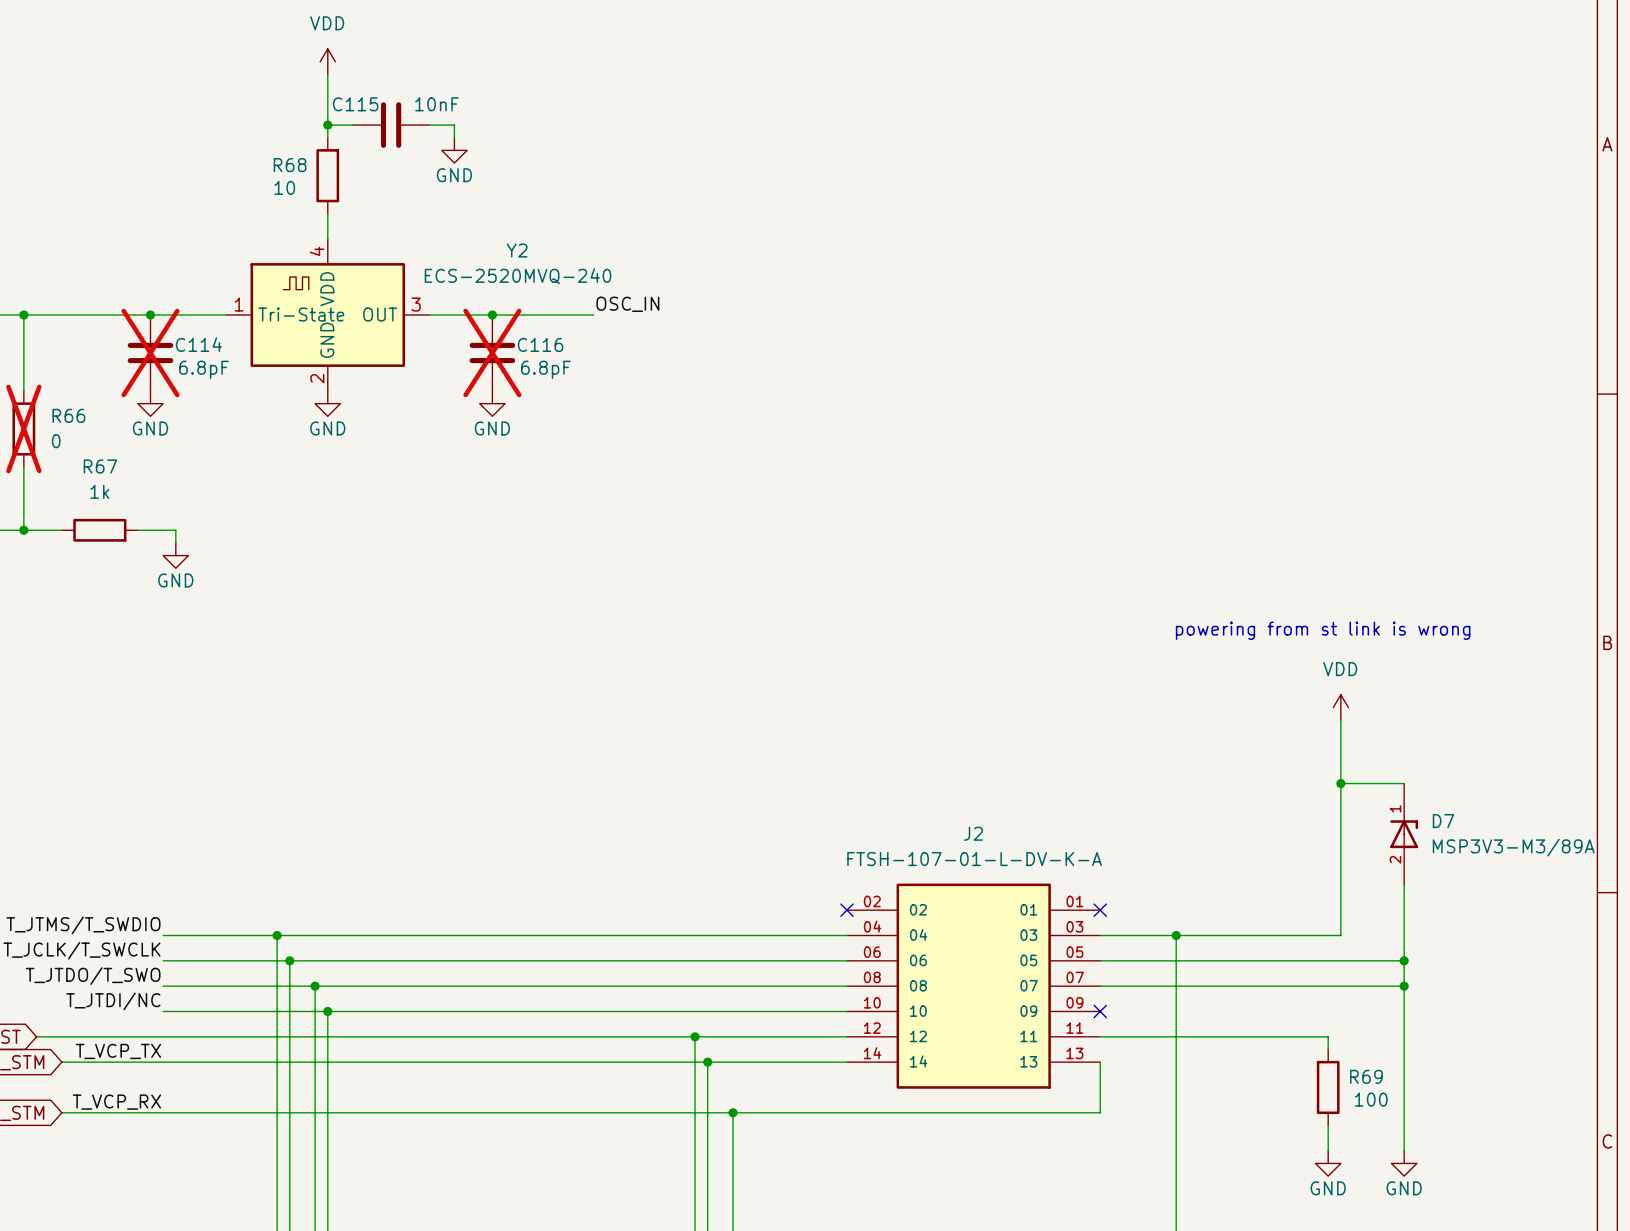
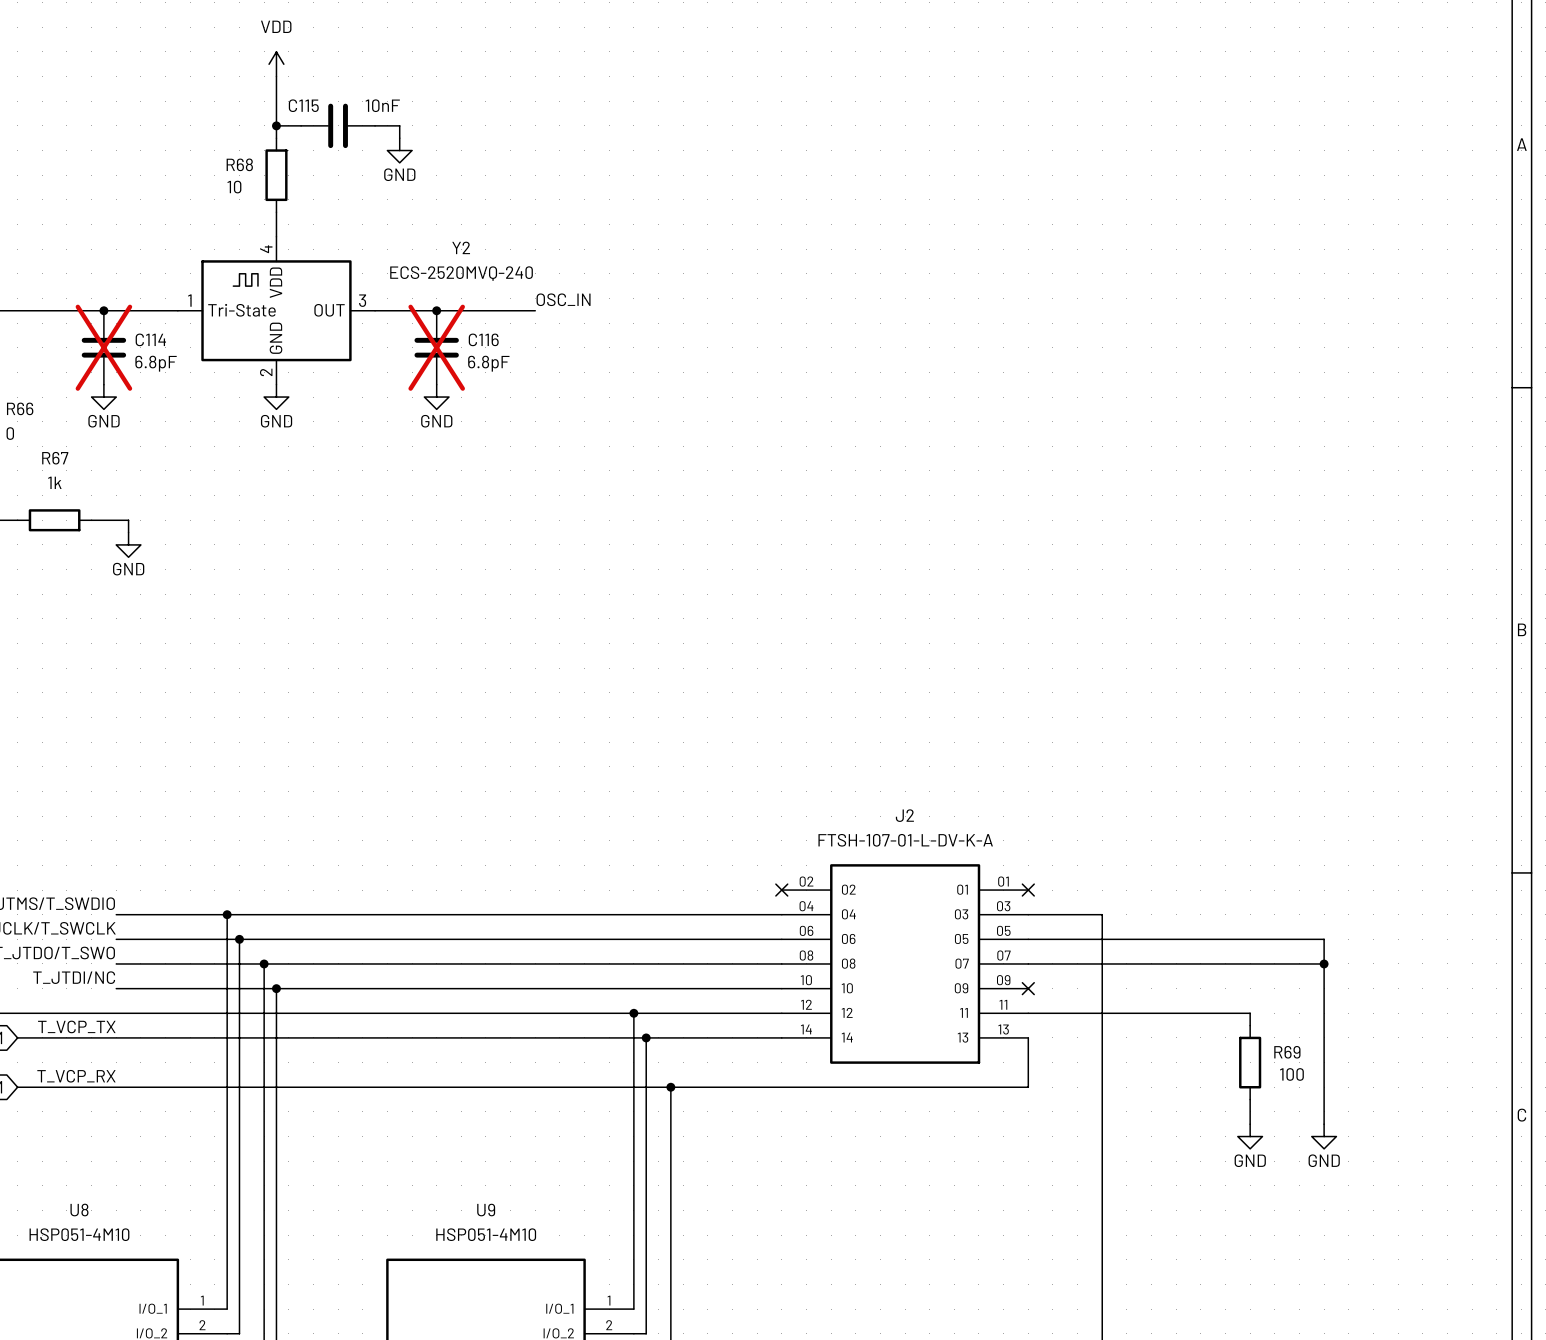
text: powering from st link is wrong (1323, 630) -> none
power symbol: VDD (1340, 707) -> none
wire: (1340, 720) (1340, 935) (1176, 935) -> none
wire: (1340, 783) (1404, 783) -> none
junction: (1340, 783) -> none
D7: MSP3V3-M3/89A (1404, 834) -> none
wire: (1404, 884) (1404, 960) -> none
junction: (1176, 935) -> none
junction: (1404, 960) -> none

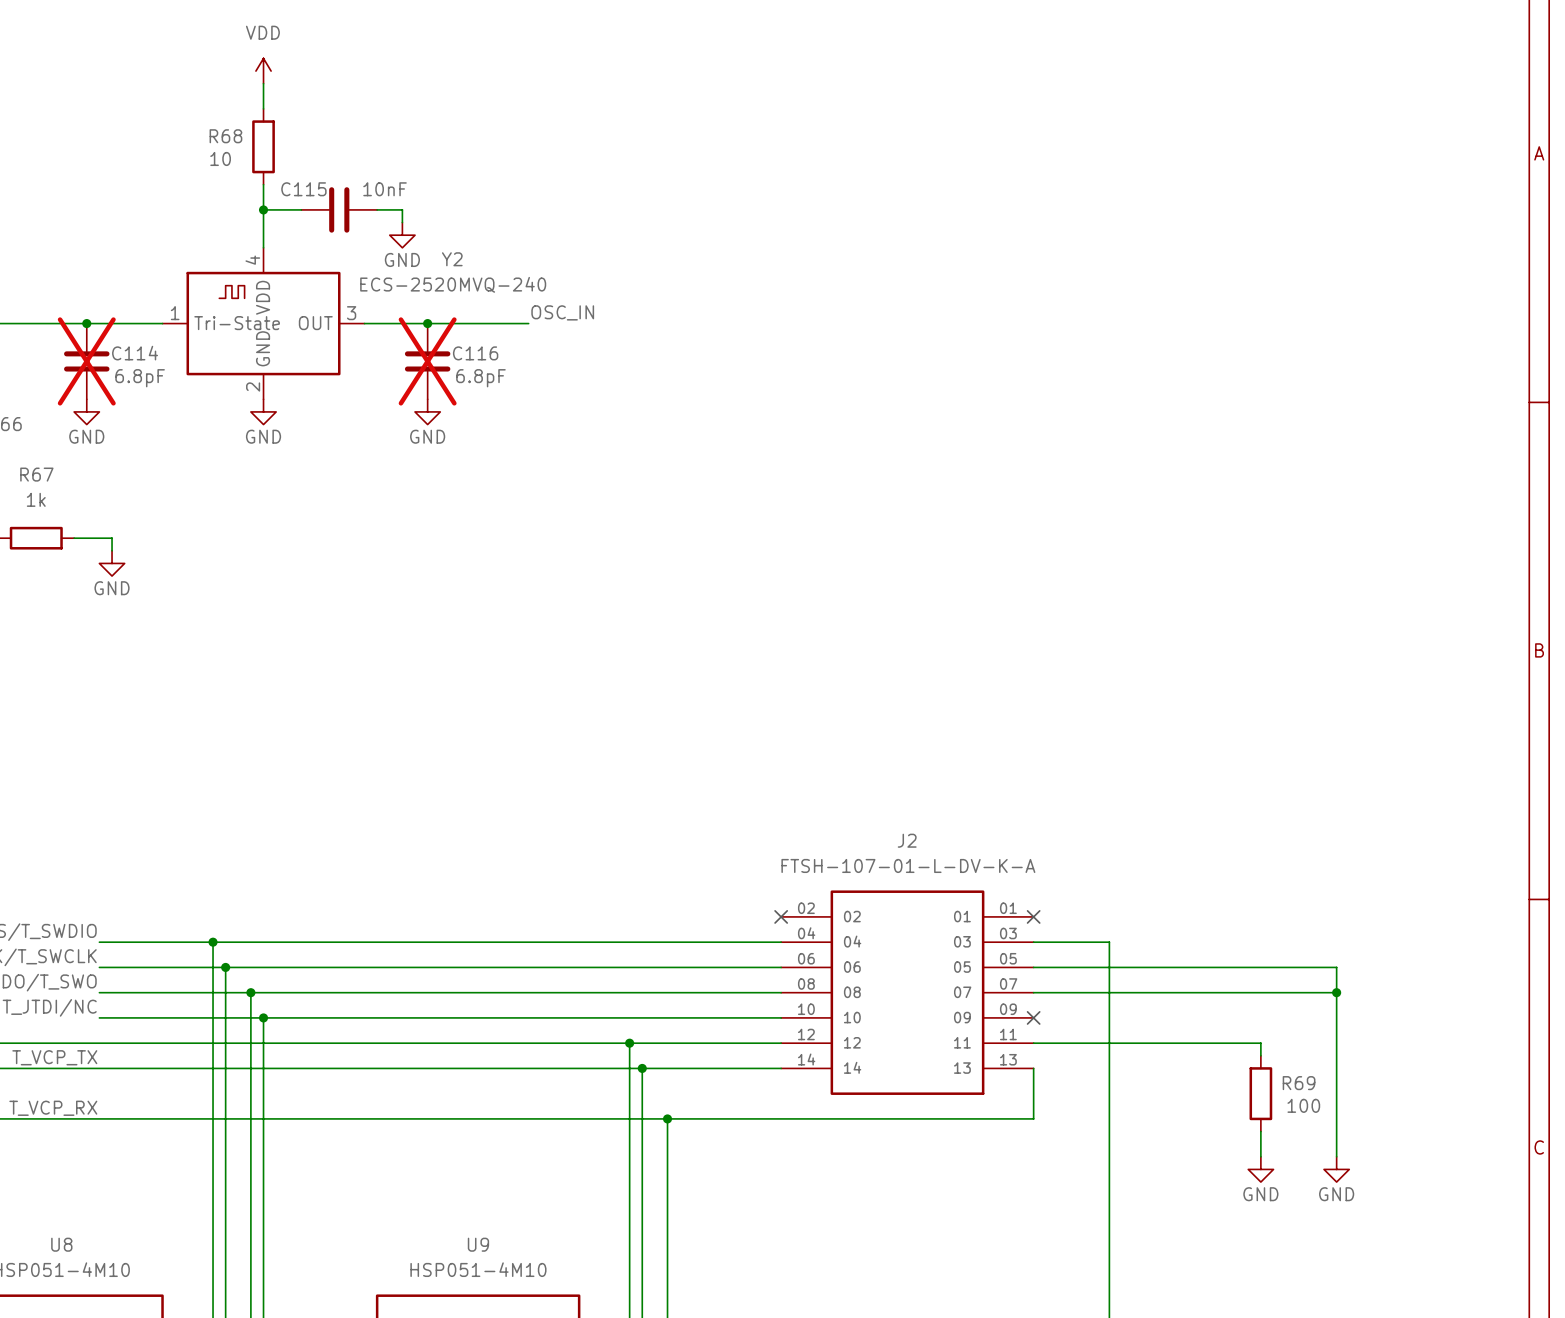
wire: (276, 101) (276, 138) -> (263, 184) (263, 222)
wire: (276, 125) (301, 125) -> none
junction: (276, 125) -> none
C115 position: (338, 125) -> (339, 209)
wire: (375, 125) (399, 125) (399, 138) -> (377, 209) (402, 209) (402, 222)
power symbol position: GND (399, 150) -> GND (402, 235)
R68 position: (276, 175) -> (263, 146)
wire: none -> (263, 209) (301, 209)
junction: none -> (263, 209)

